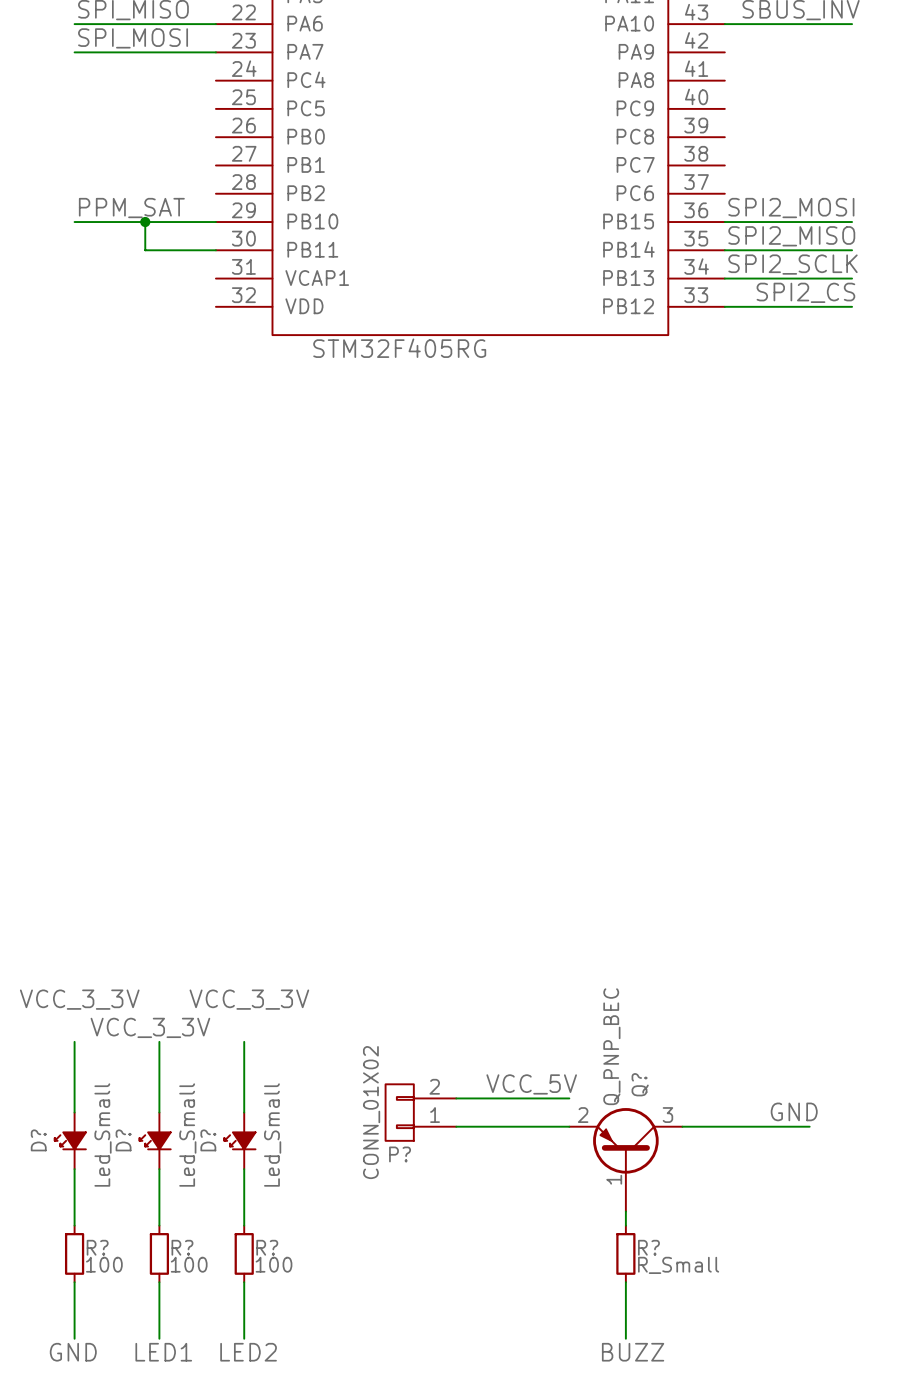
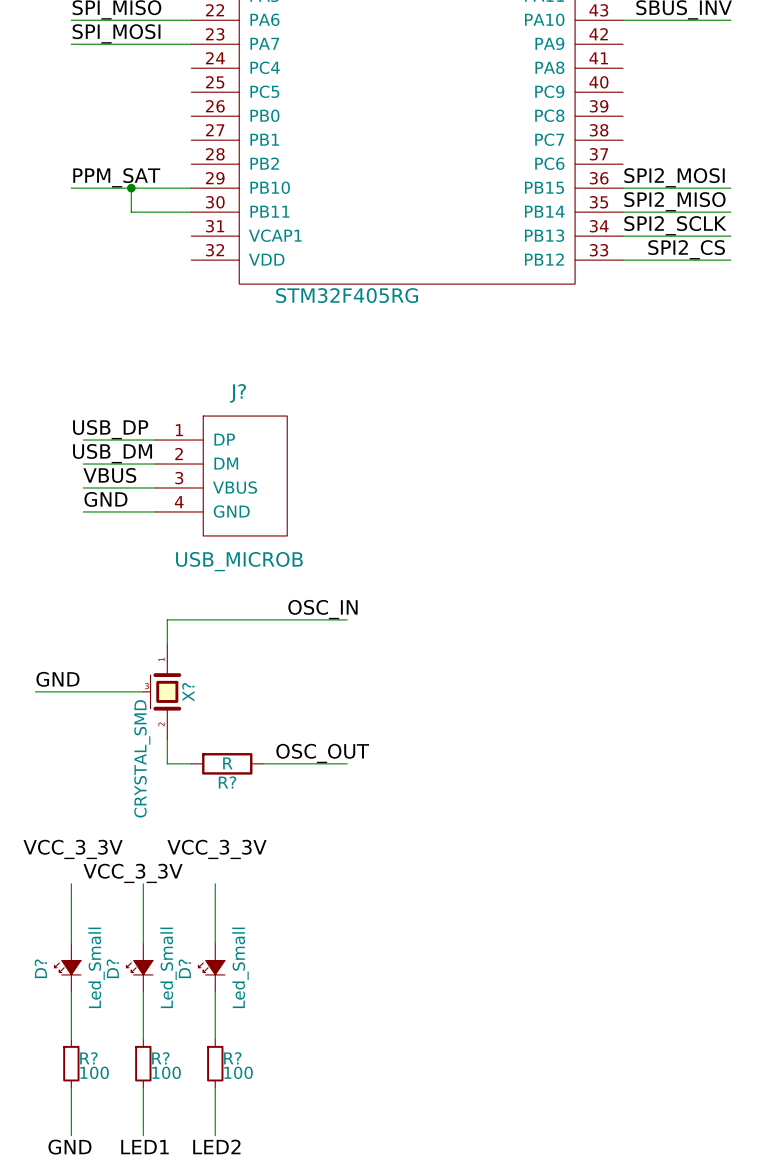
label: none -> USB_DP (110, 429)
wire: none -> (83, 440) (155, 440)
label: none -> USB_DM (112, 453)
wire: none -> (83, 464) (155, 464)
label: none -> VBUS (109, 475)
J?: none -> USB_MICROB (221, 476)
wire: none -> (83, 487) (155, 487)
label: none -> GND (105, 499)
wire: none -> (83, 511) (155, 511)
label: none -> OSC_IN (322, 609)
wire: none -> (347, 619) (167, 619) (167, 643)
label: none -> GND (57, 679)
wire: none -> (35, 691) (143, 691)
X?: none -> CRYSTAL_SMD (162, 691)
wire: none -> (167, 739) (167, 763) (191, 763)
label: none -> OSC_OUT (322, 753)
R?: none -> R (227, 763)
wire: none -> (263, 763) (347, 763)
label: VCC_5V (531, 1084) -> none
wire: (456, 1098) (569, 1098) -> none
label: GND (794, 1111) -> none
P?: CONN_01X02 (420, 1112) -> none
wire: (456, 1126) (569, 1126) -> none
wire: (682, 1126) (809, 1126) -> none
Q?: Q_PNP_BEC (625, 1159) -> none
wire: (625, 1211) (625, 1225) -> none
R?: R_Small (625, 1253) -> none
wire: (625, 1282) (625, 1338) -> none
label: BUZZ (633, 1352) -> none

